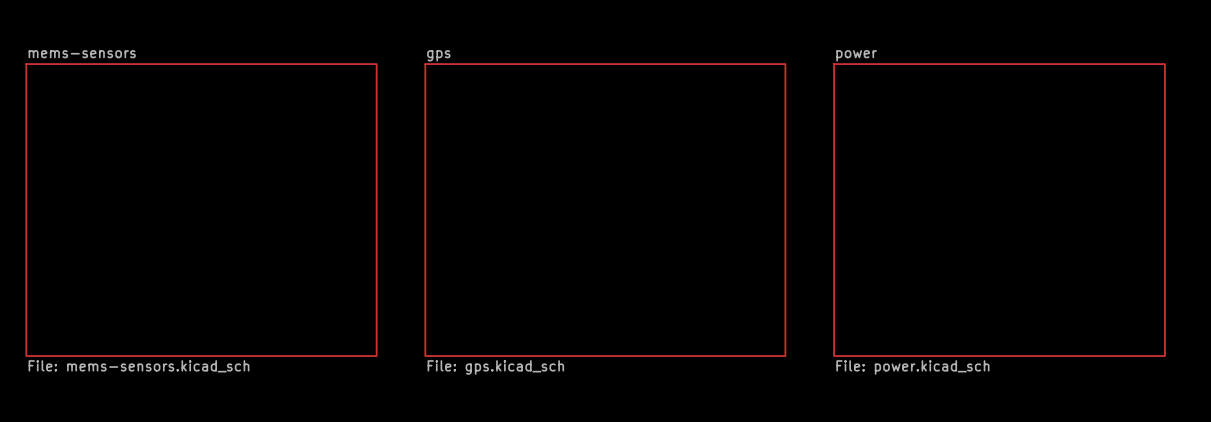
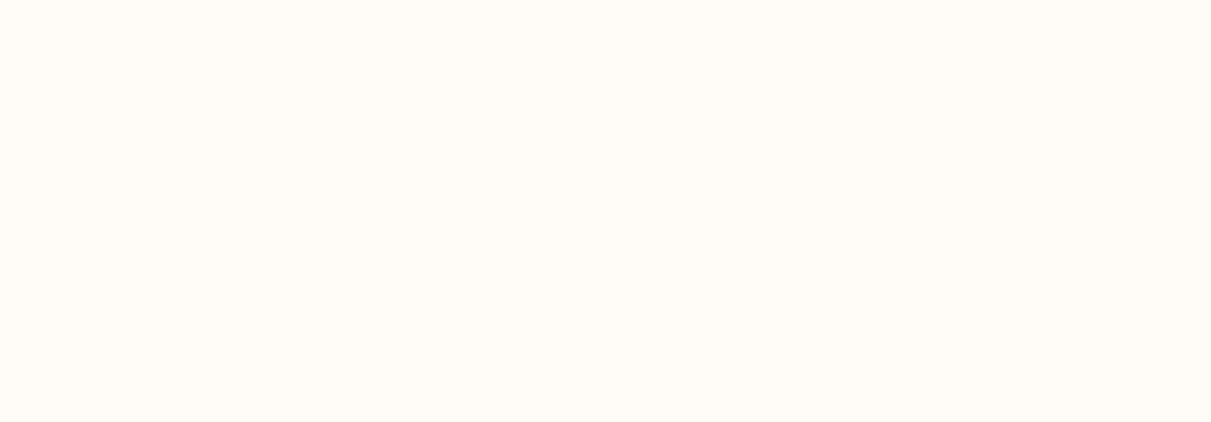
sheet mems-sensors: File: mems-sensors.kicad_sch (201, 210) -> none
sheet gps: File: gps.kicad_sch (605, 210) -> none
sheet power: File: power.kicad_sch (999, 210) -> none

